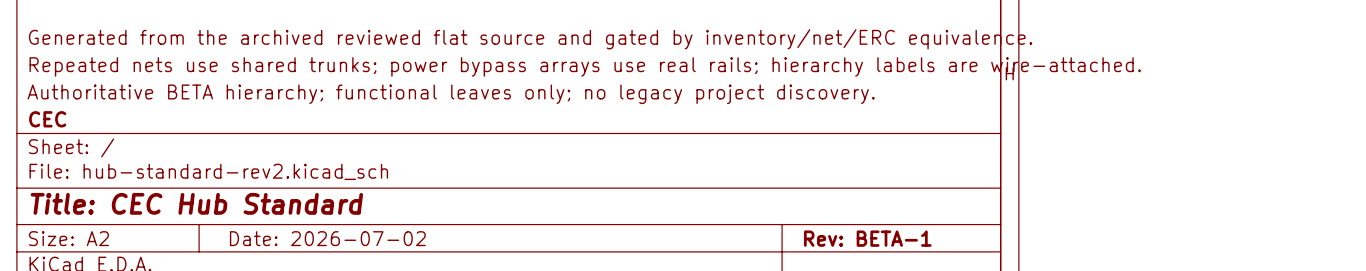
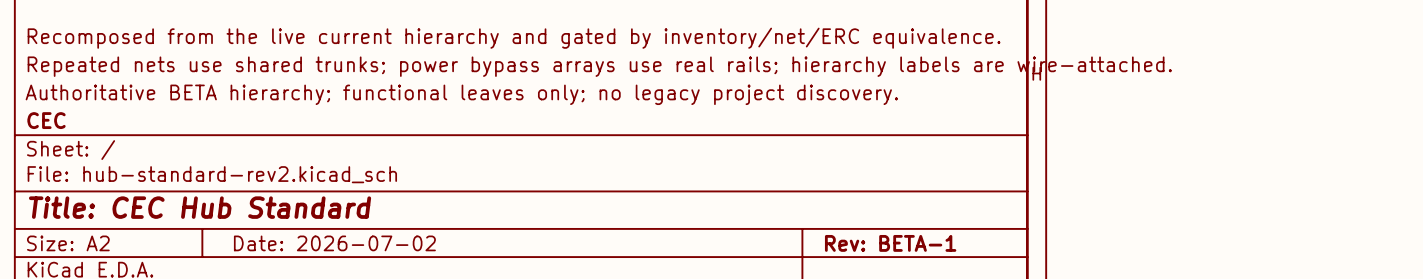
title block: Generated from the archived reviewed flat source and gated by inventory/net/ERC equivalence. (530, 39) -> Recomposed from the live current hierarchy and gated by inventory/net/ERC equivalence. (514, 38)

